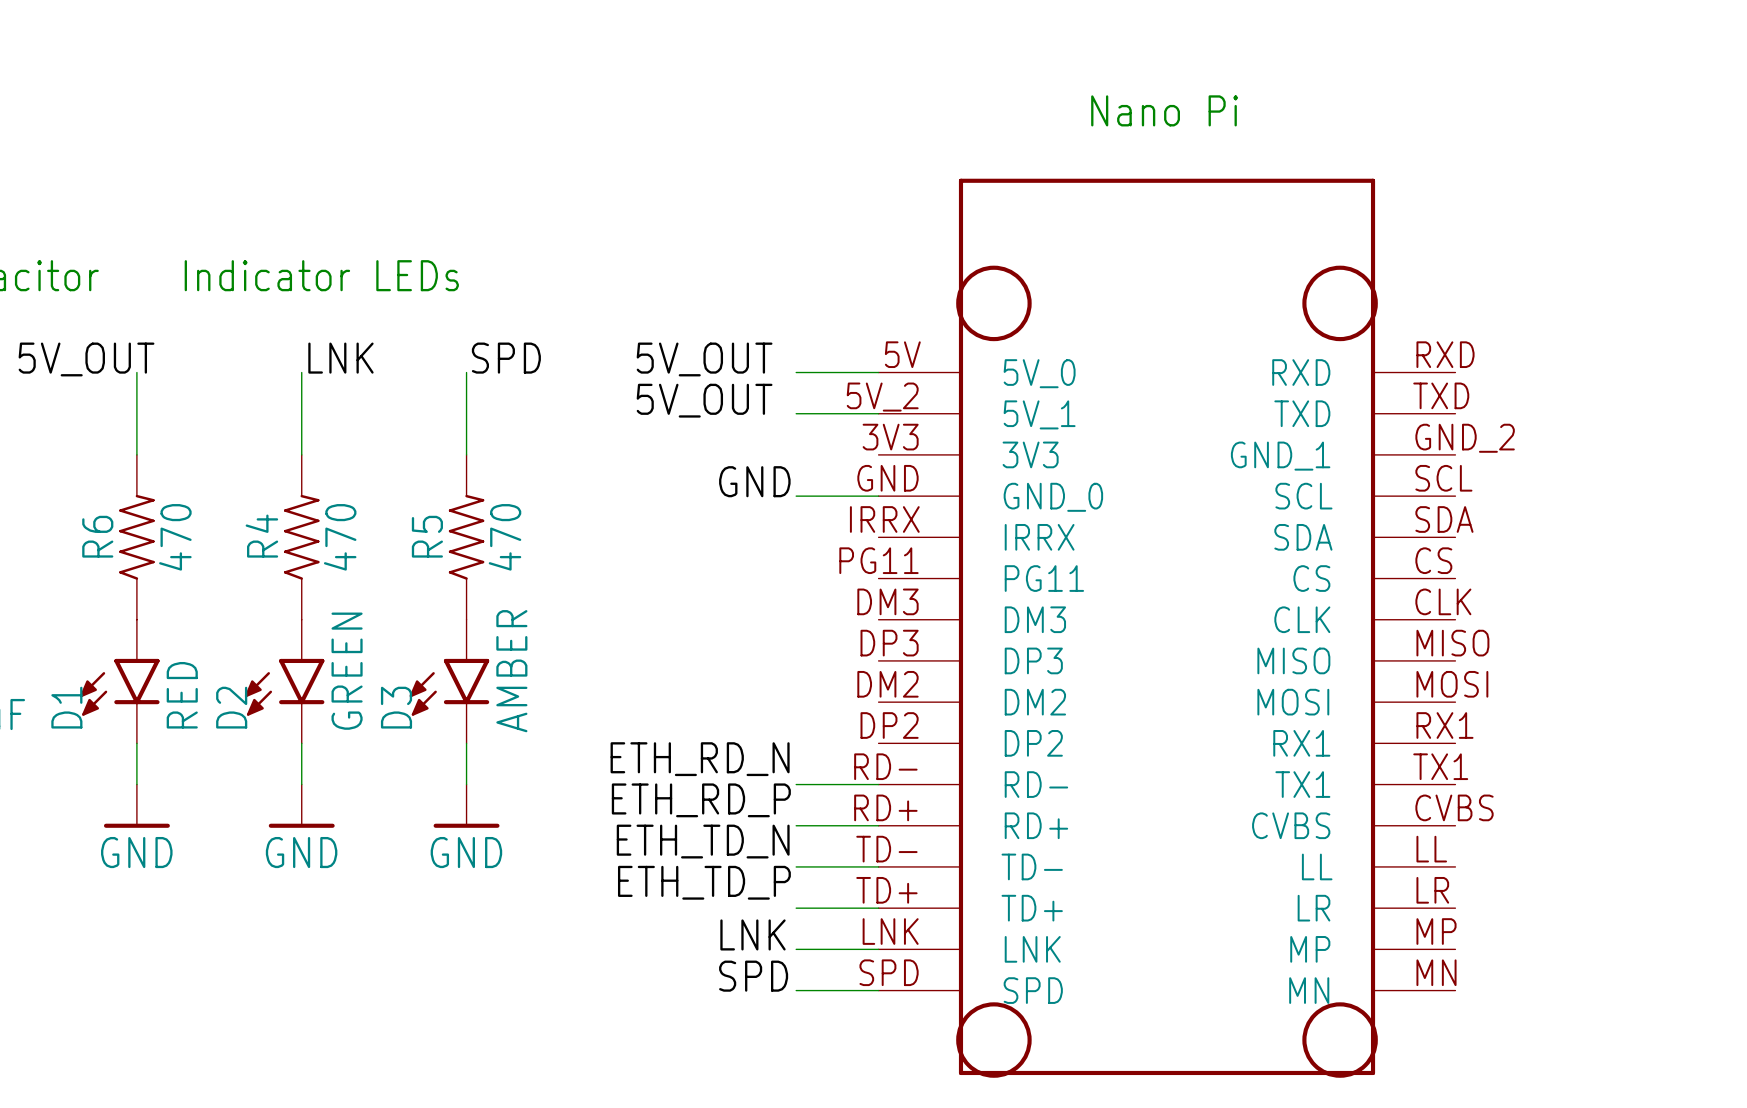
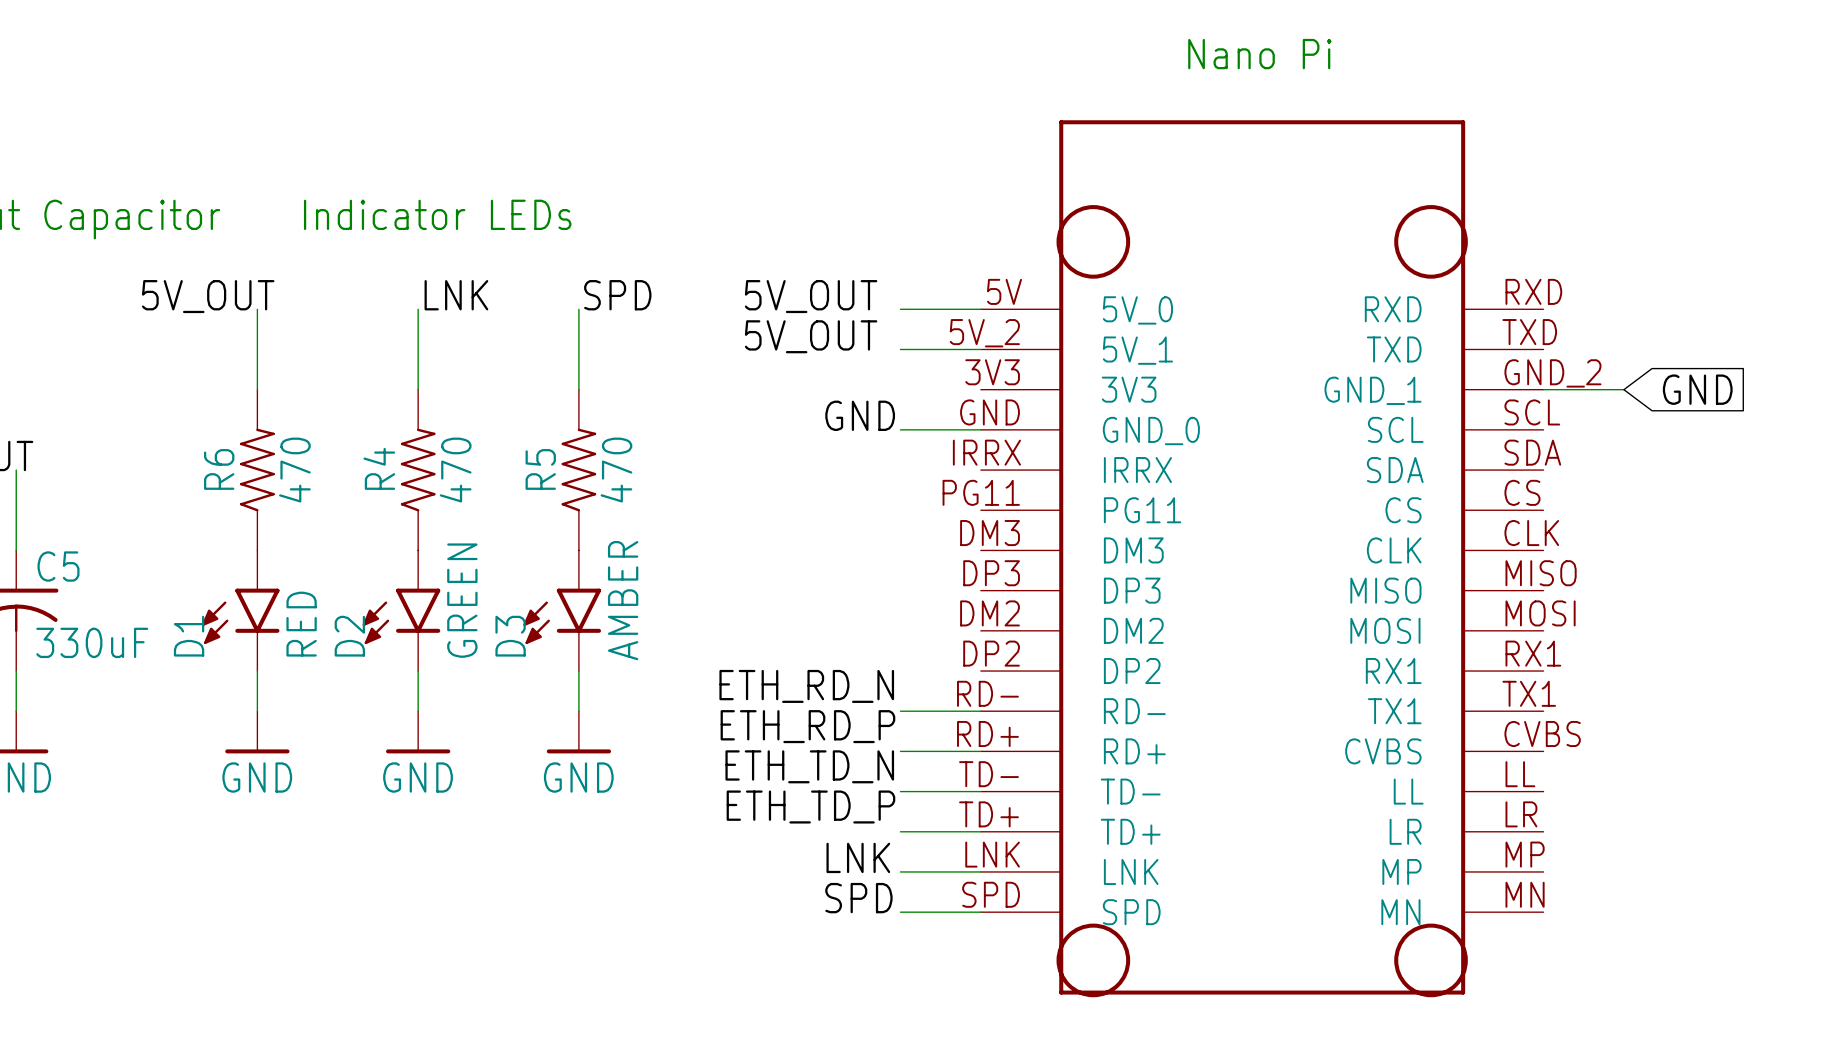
wire: none -> (1543, 389) (1623, 389)
global label: none -> GND (1697, 389)

